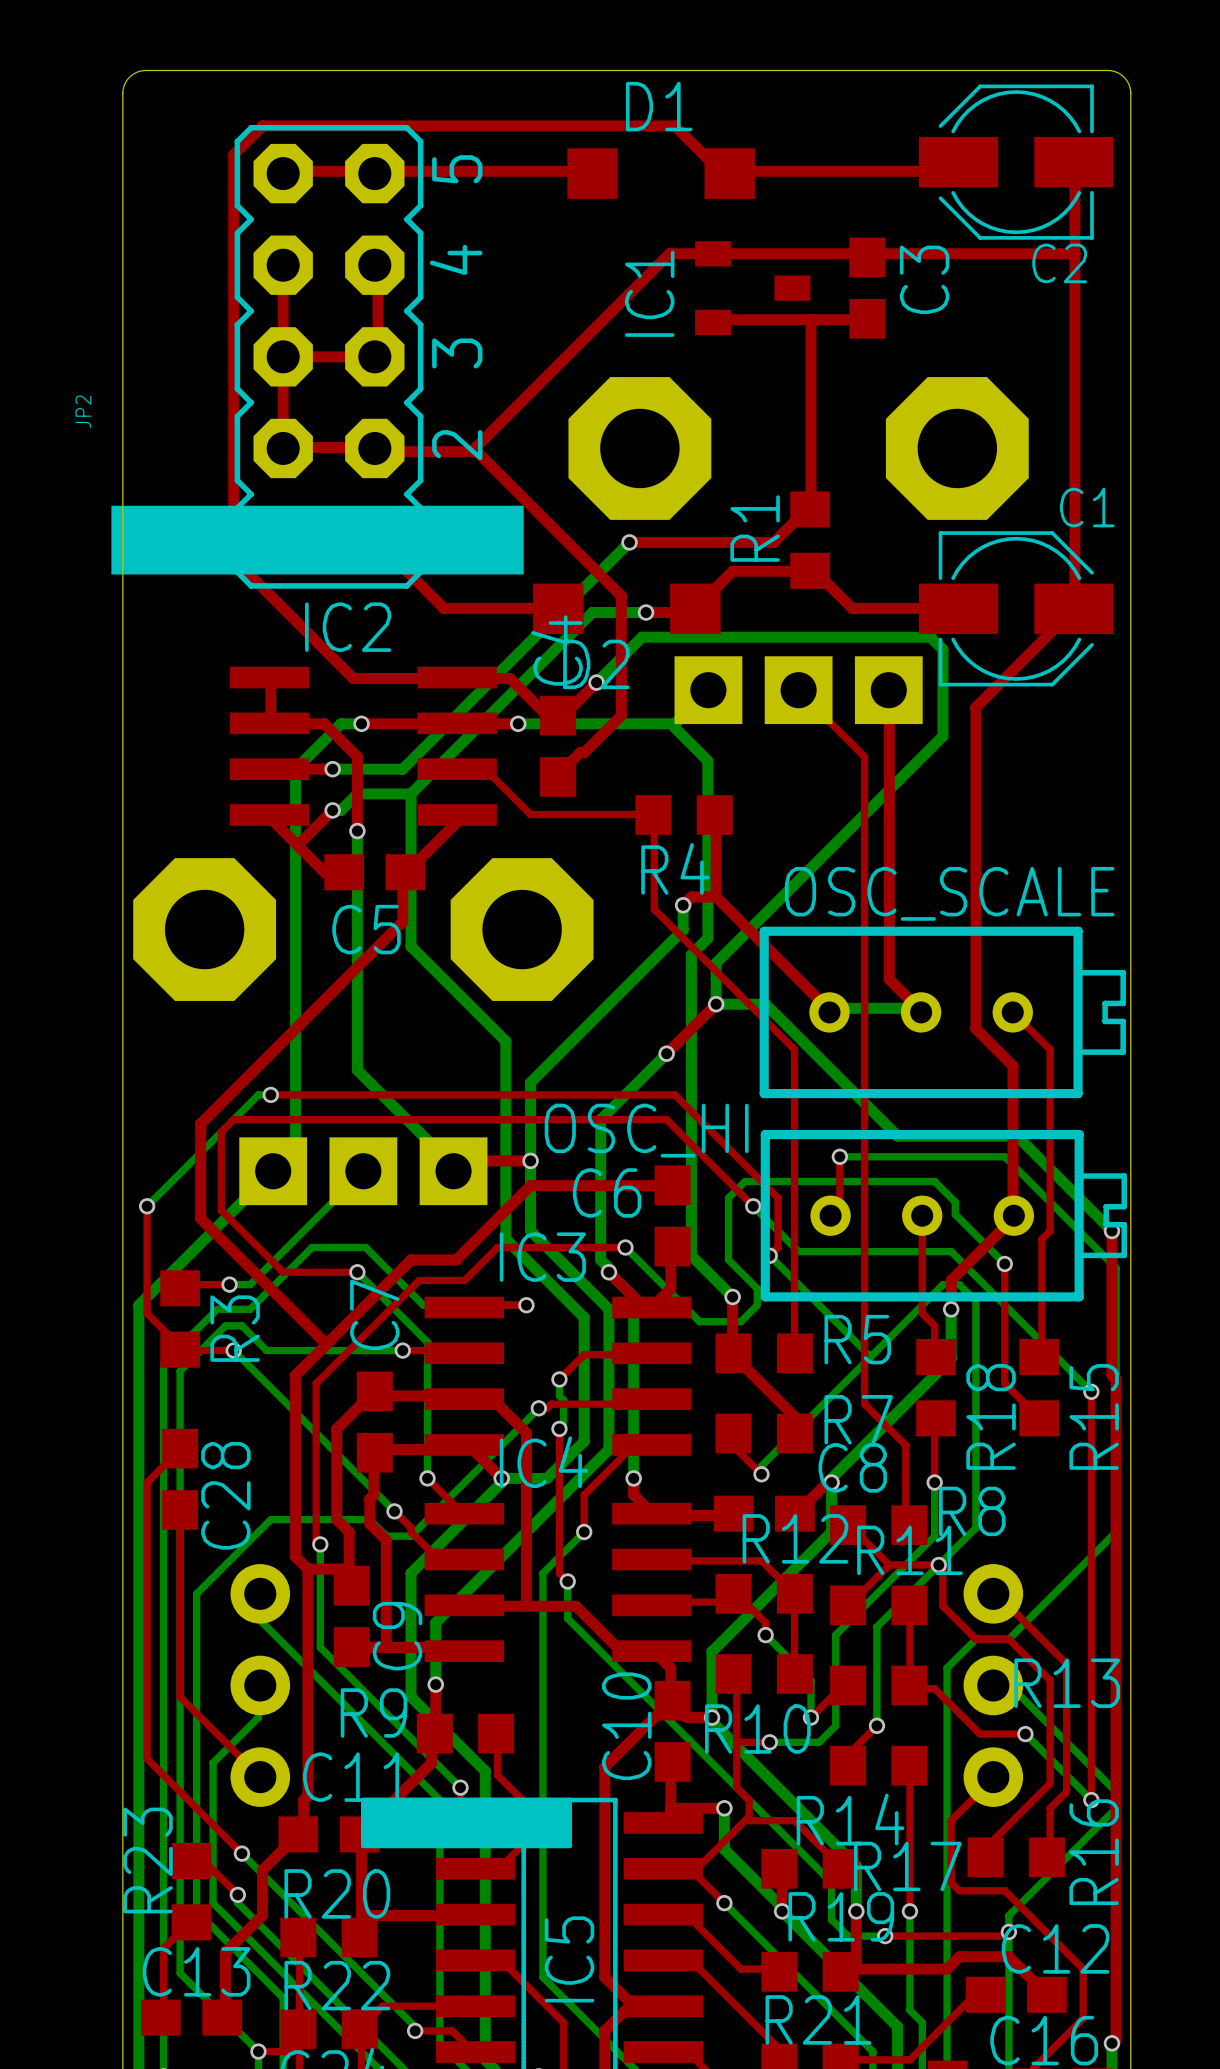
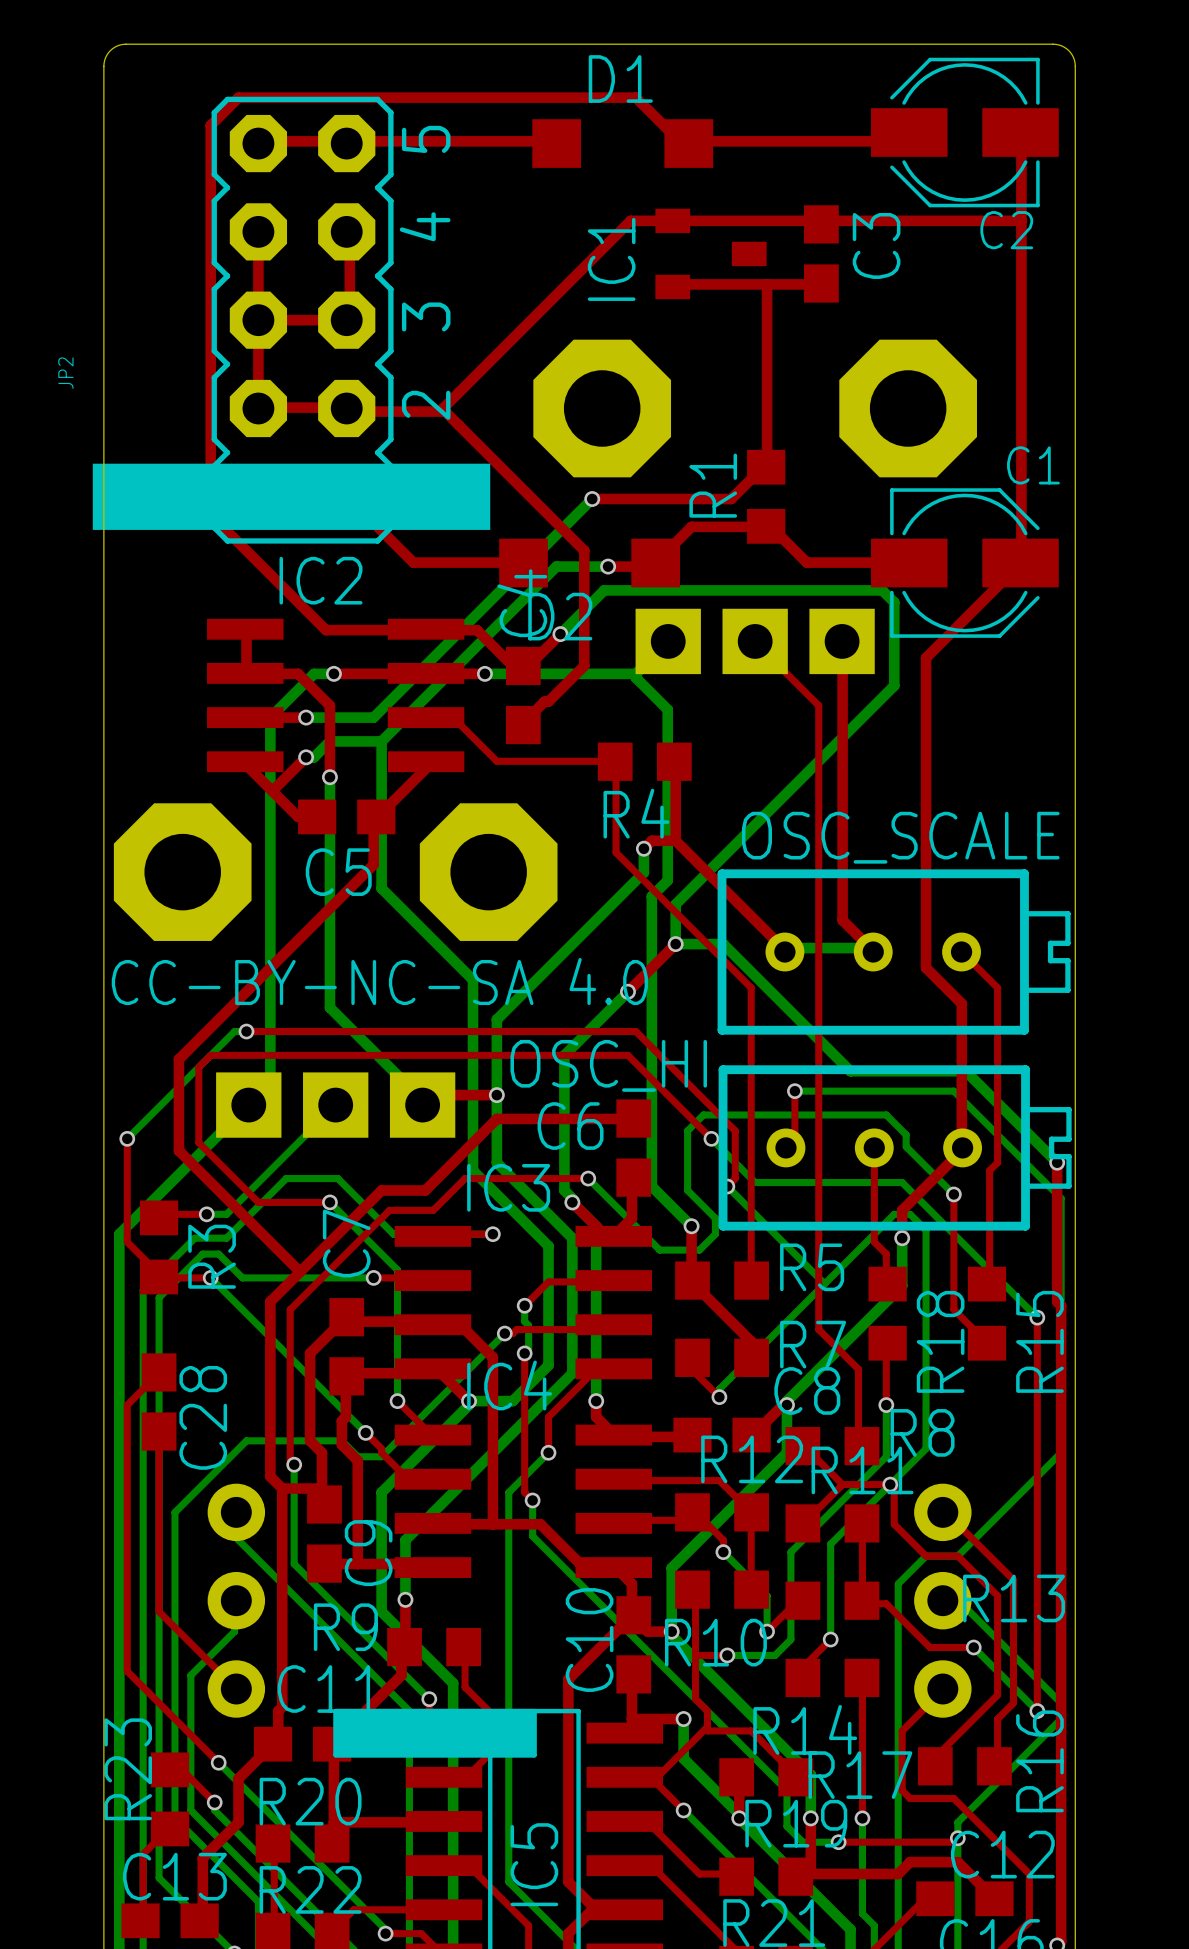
text: none -> CC-BY-NC-SA 4.0 (379, 981)

